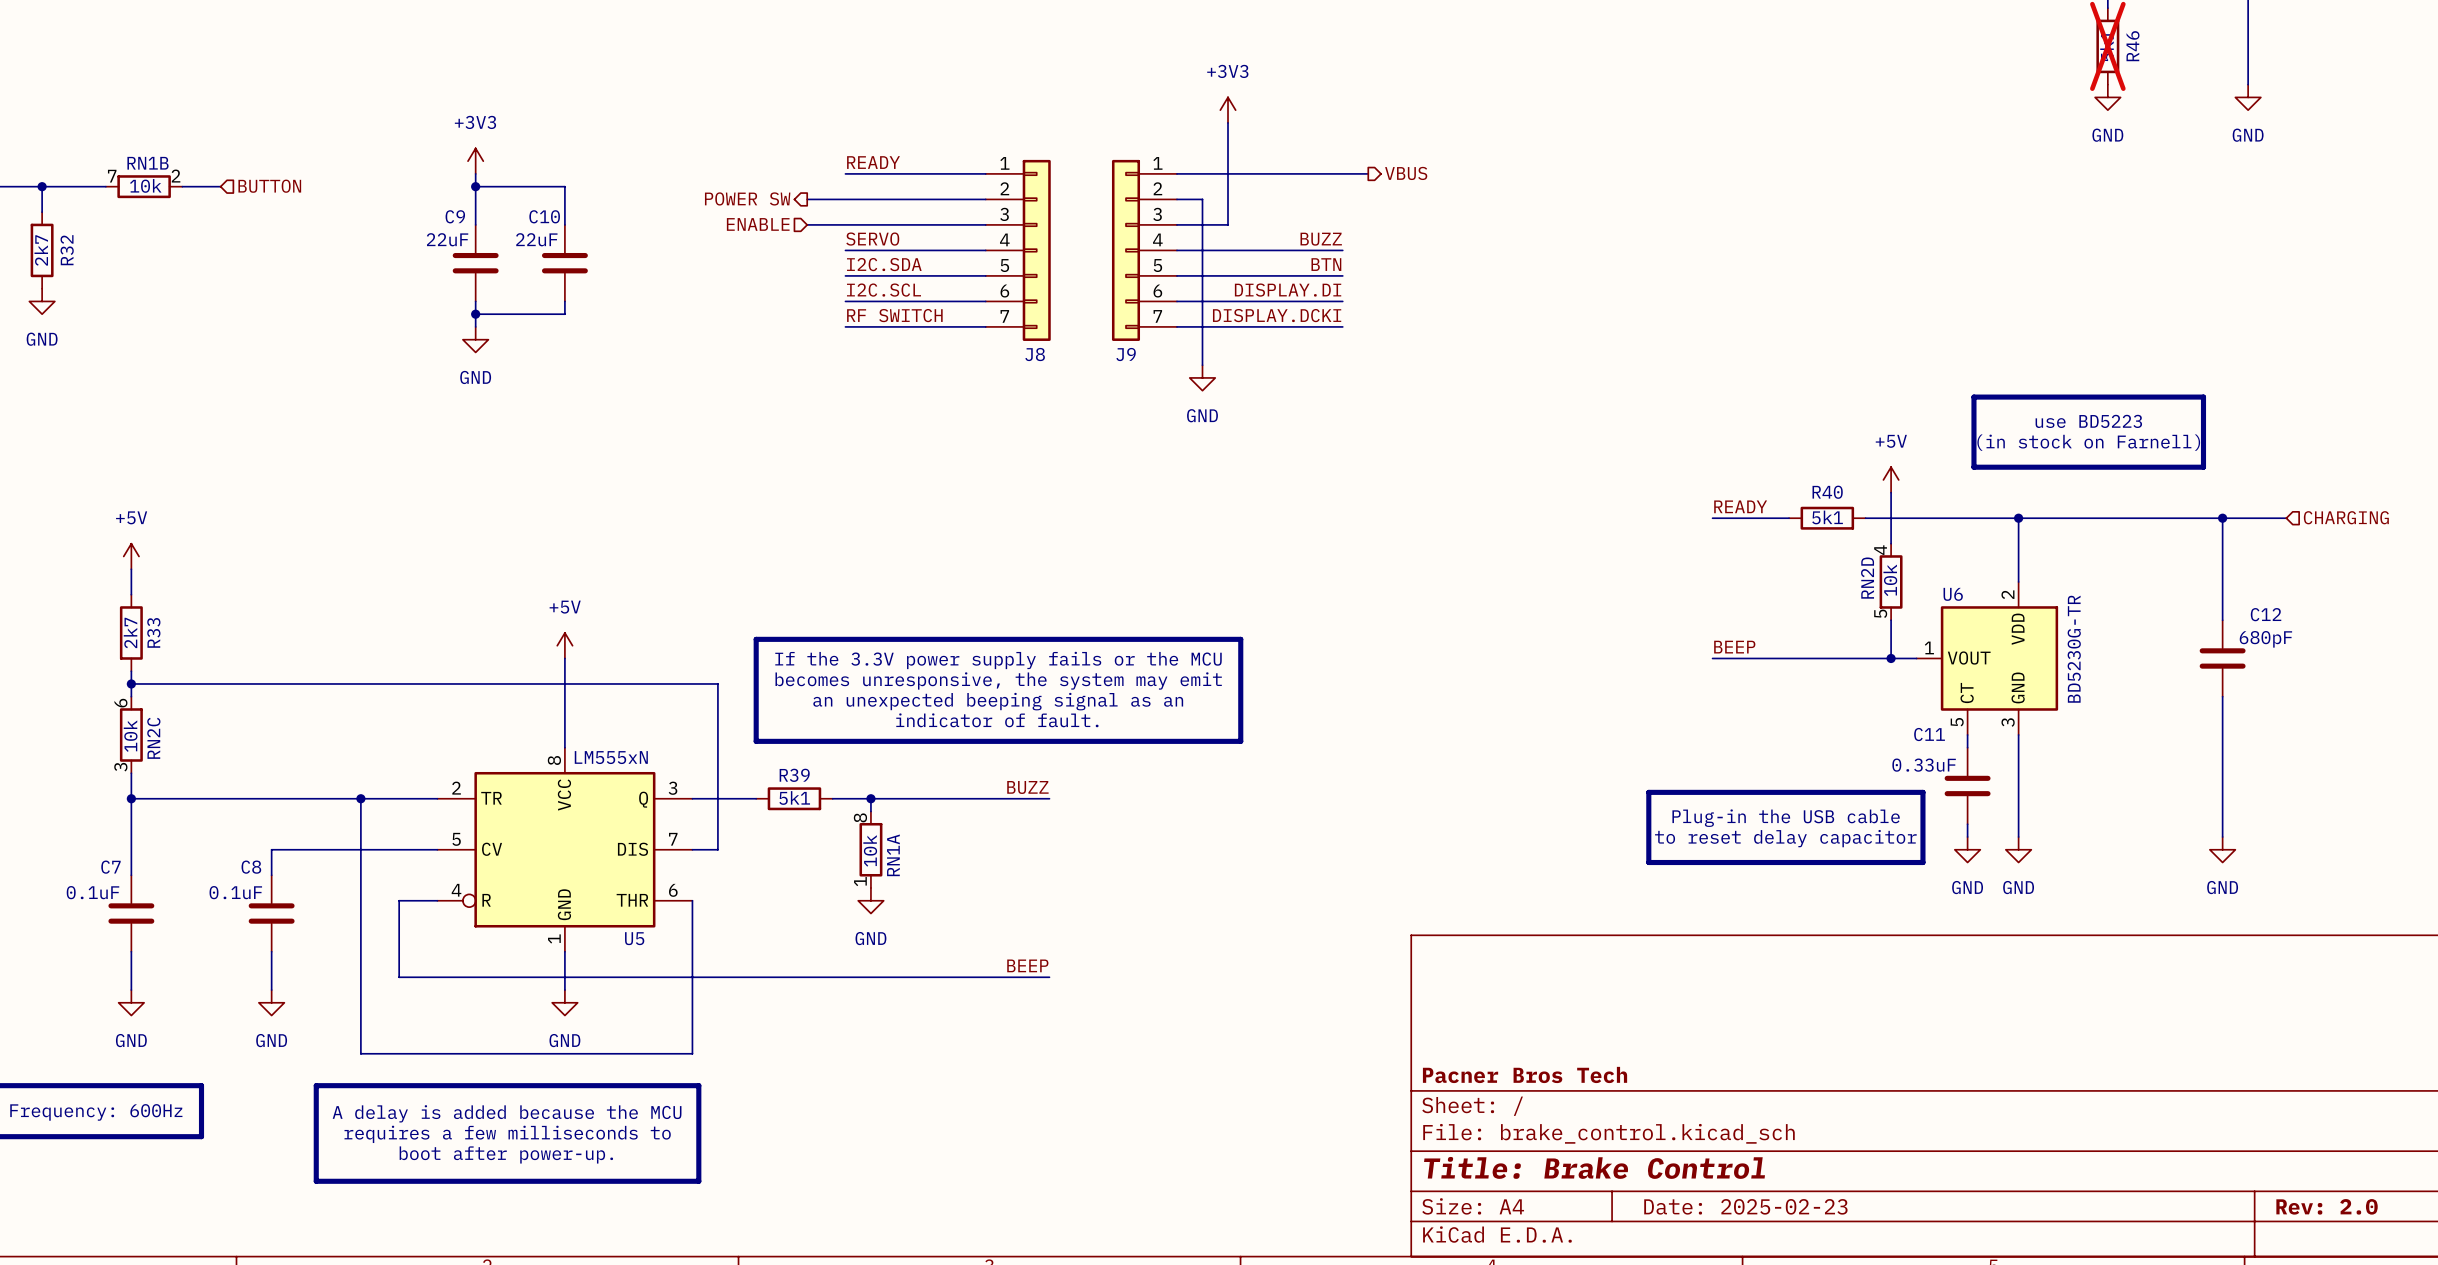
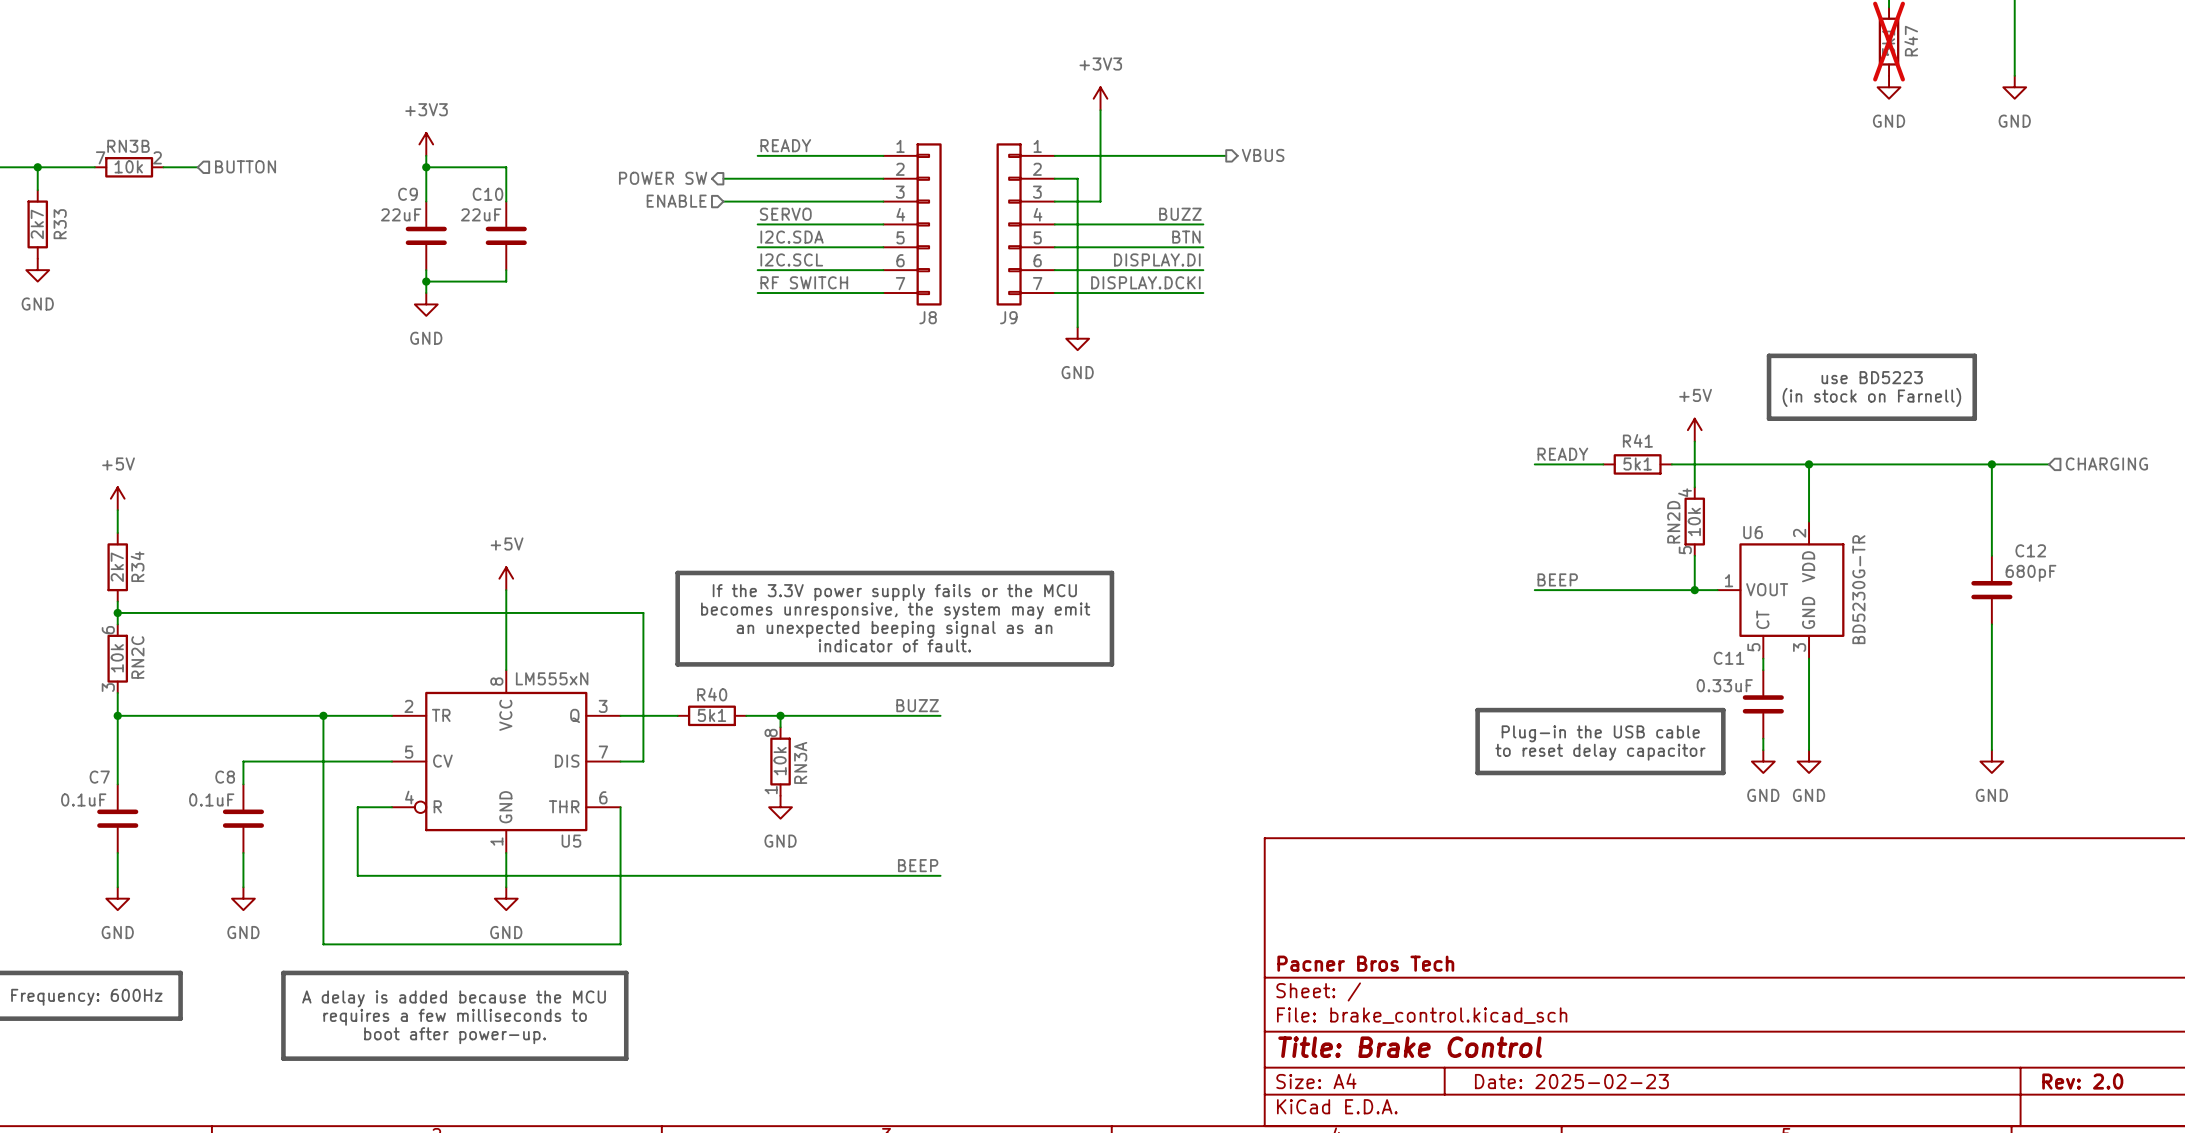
R46 name: R46 (2132, 46) -> R47 (1911, 41)
RN1B name: RN1B (148, 163) -> RN3B (128, 146)
R32 name: R32 (67, 250) -> R33 (60, 224)
R40 name: R40 (1827, 492) -> R41 (1637, 440)
R33 name: R33 (153, 632) -> R34 (137, 566)
R39 name: R39 (794, 775) -> R40 (712, 694)
RN1A name: RN1A (893, 855) -> RN3A (800, 762)

